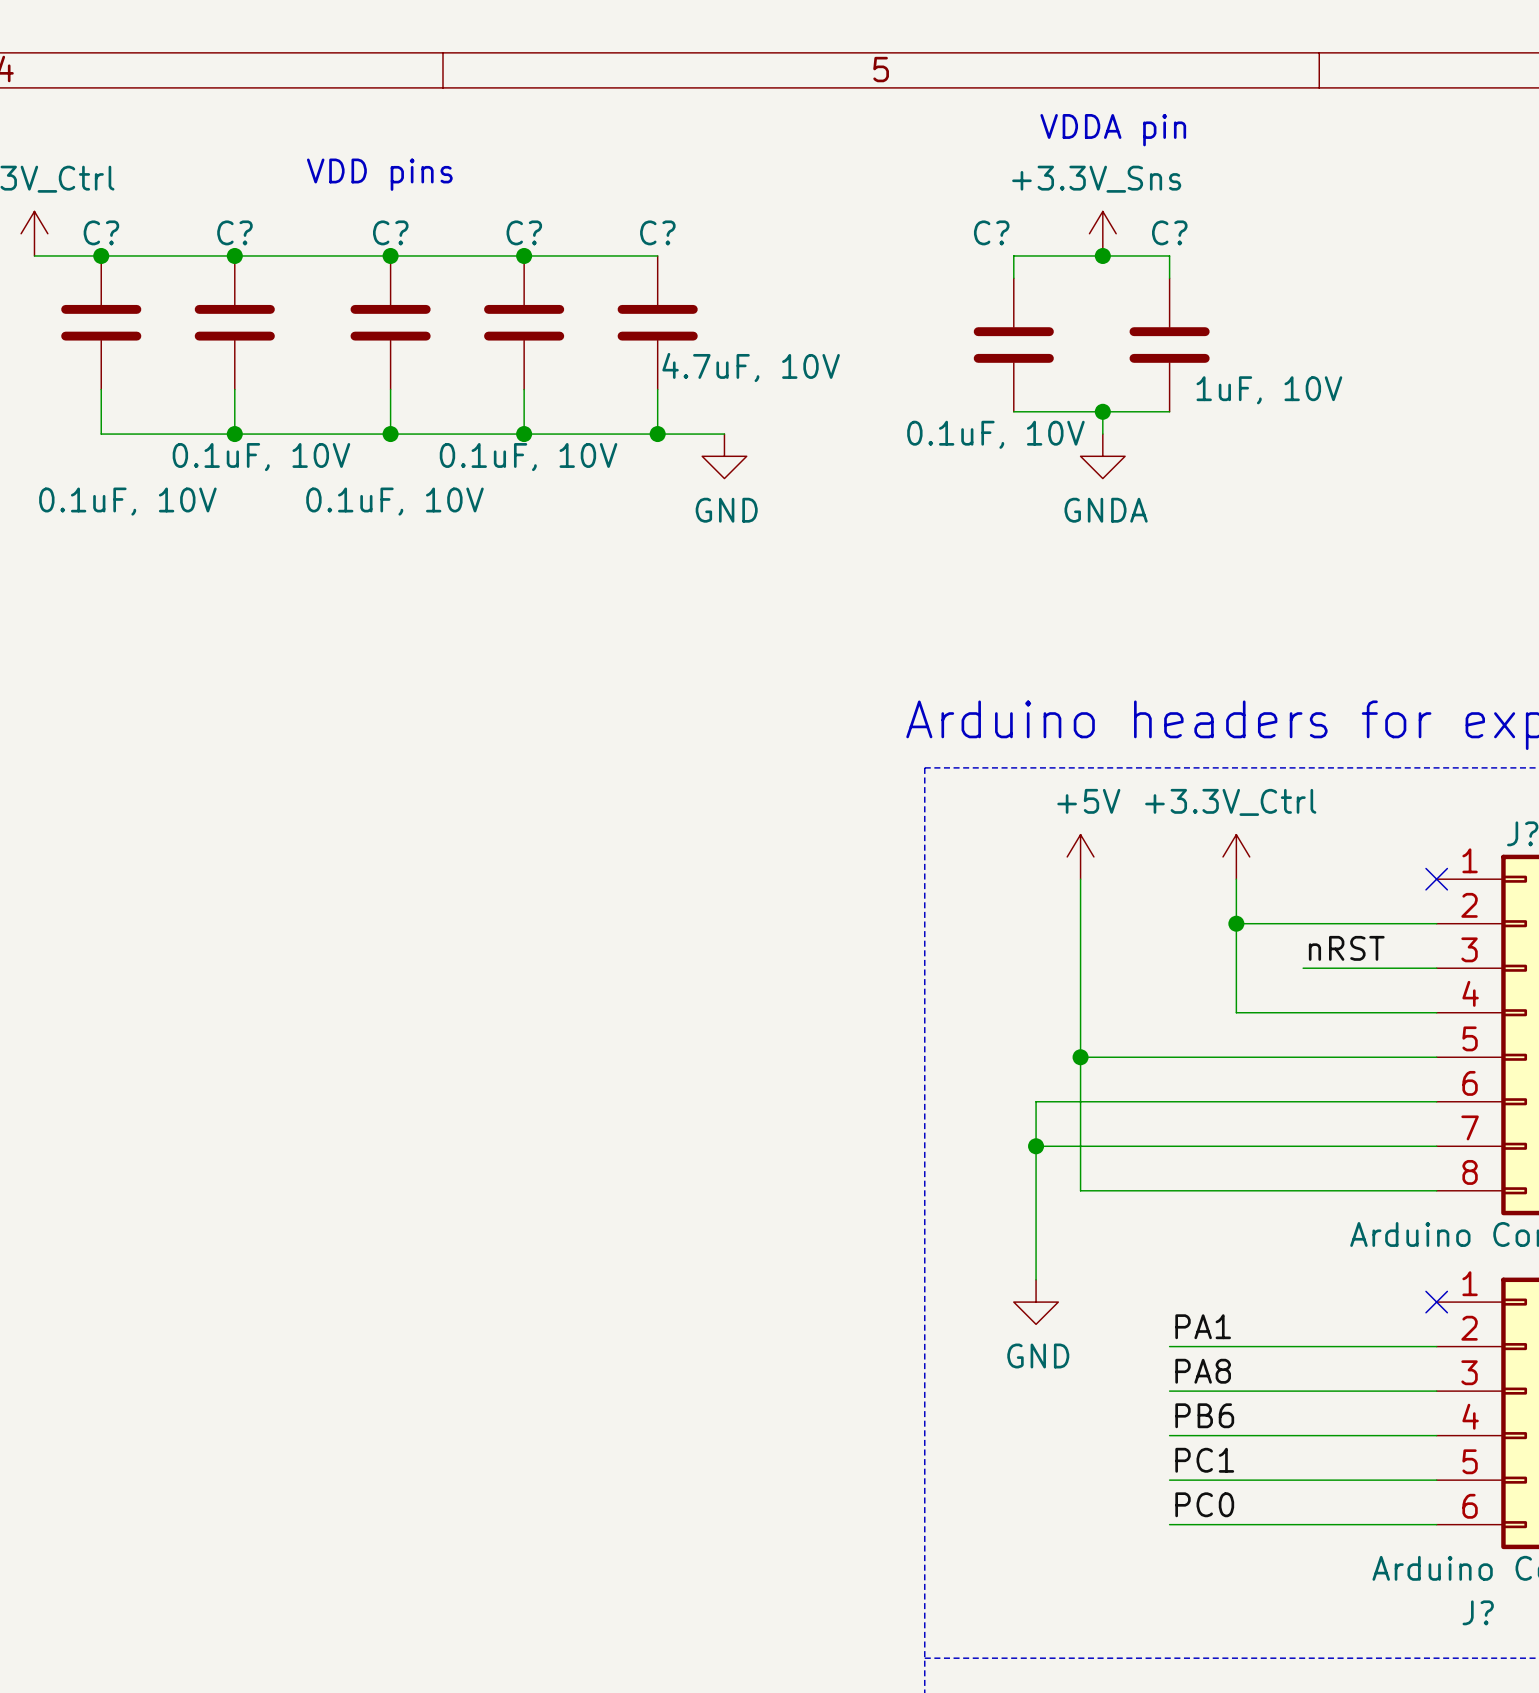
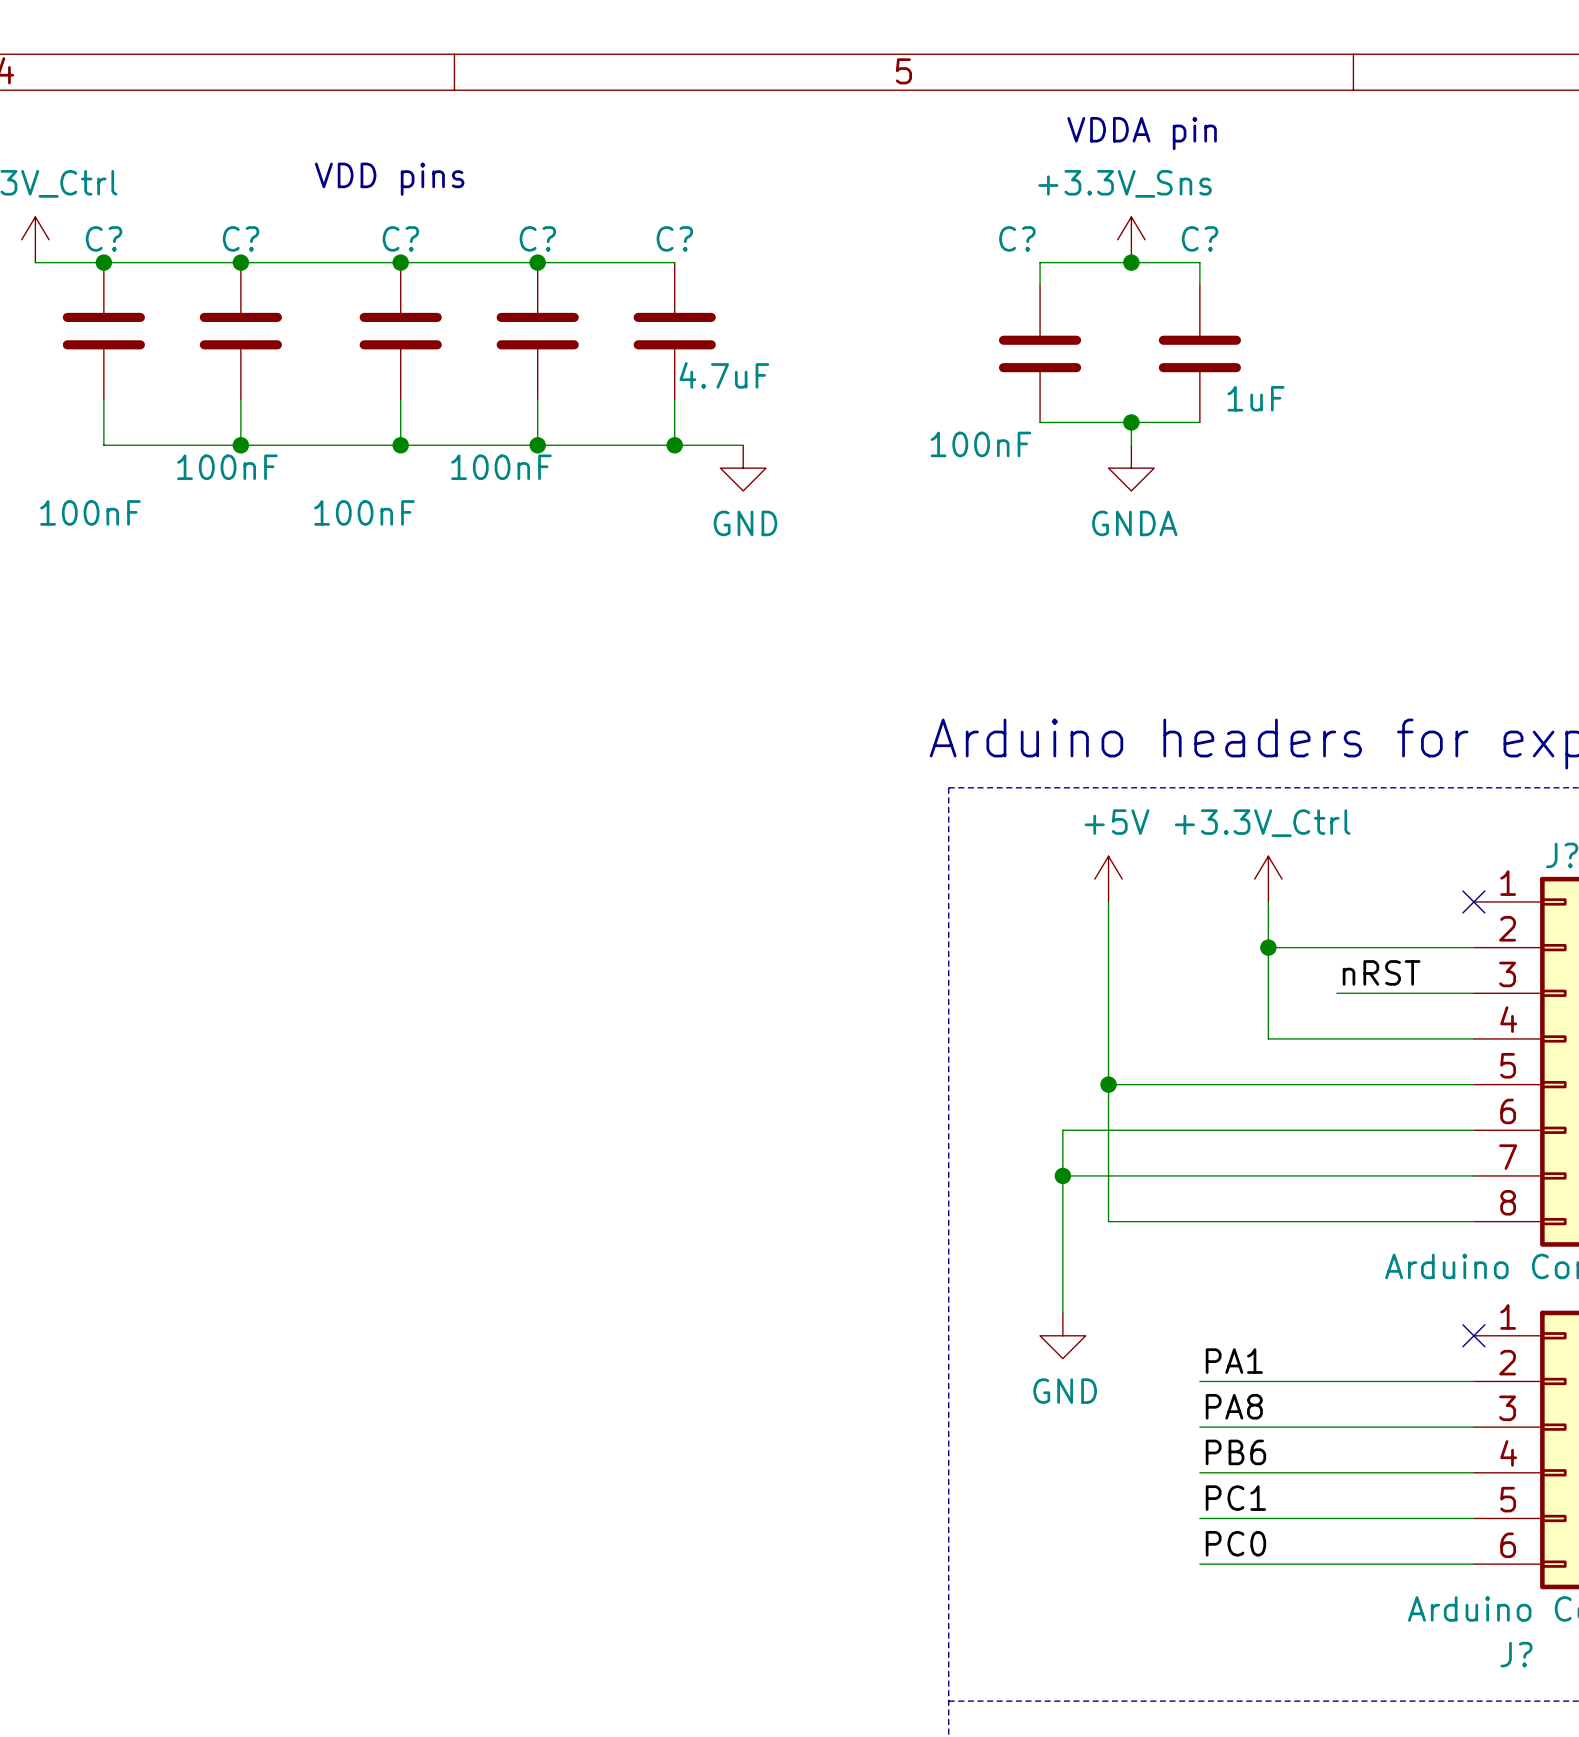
C? value: 4.7uF, 10V (751, 367) -> 4.7uF (724, 375)
C? value: 1uF, 10V (1269, 390) -> 1uF (1256, 398)
C? value: 0.1uF, 10V (995, 434) -> 100nF (980, 444)
C? value: 0.1uF, 10V (261, 457) -> 100nF (227, 467)
C? value: 0.1uF, 10V (528, 457) -> 100nF (501, 467)
C? value: 0.1uF, 10V (127, 501) -> 100nF (90, 512)
C? value: 0.1uF, 10V (395, 501) -> 100nF (364, 512)

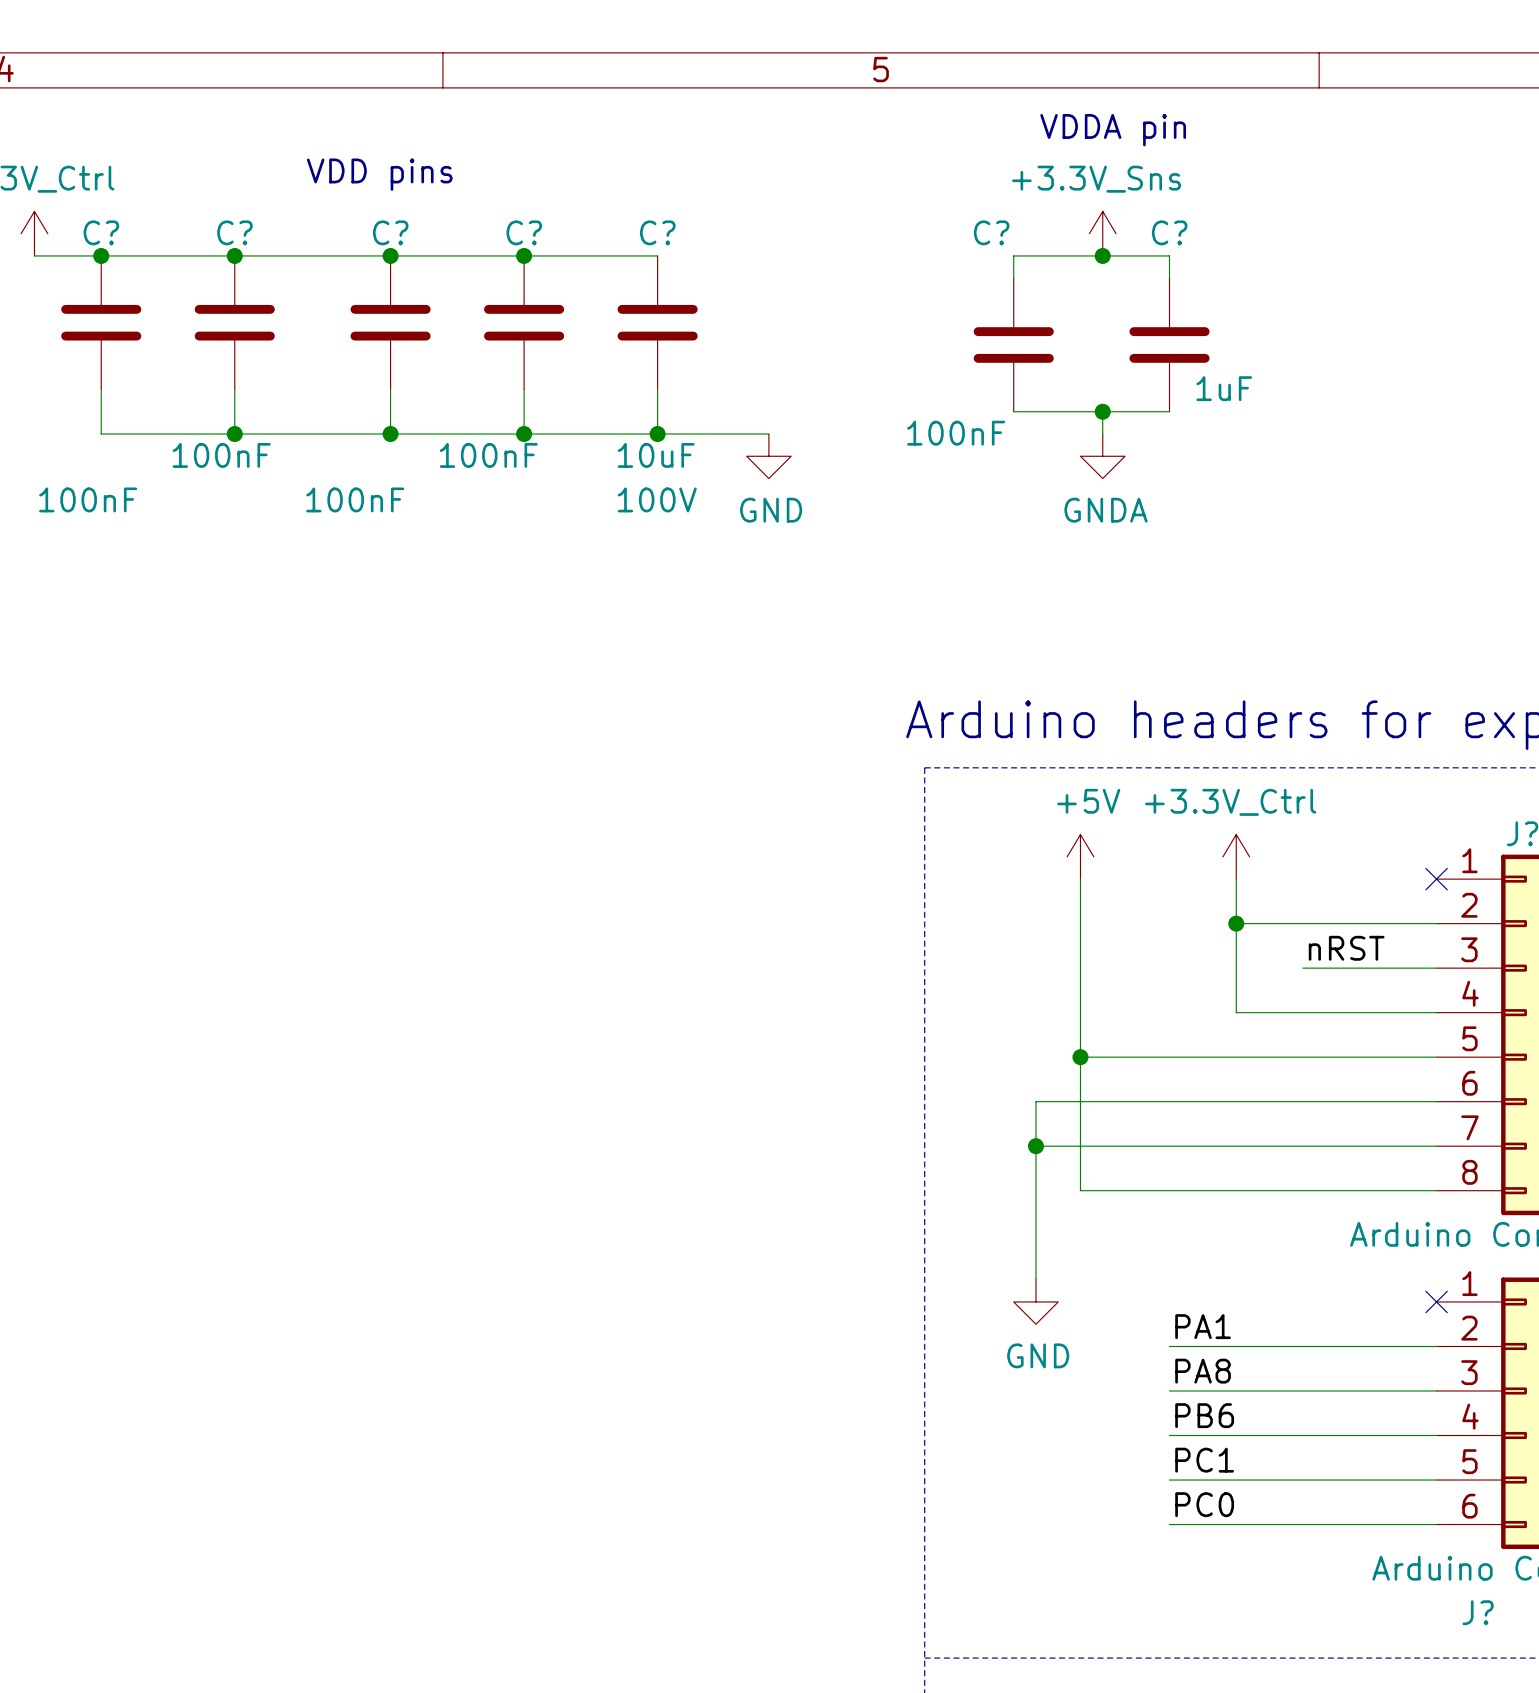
C? value: 4.7uF (724, 375) -> 10uF (656, 455)
wire: none -> (724, 434) (768, 434)
power symbol position: GND (743, 468) -> GND (768, 456)
C? text: none -> 100V (657, 499)

